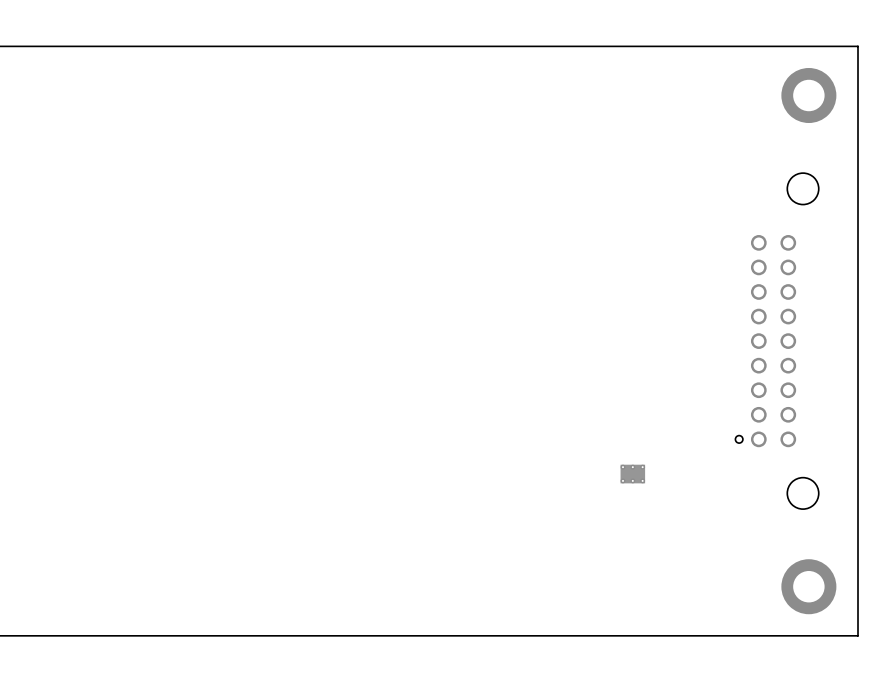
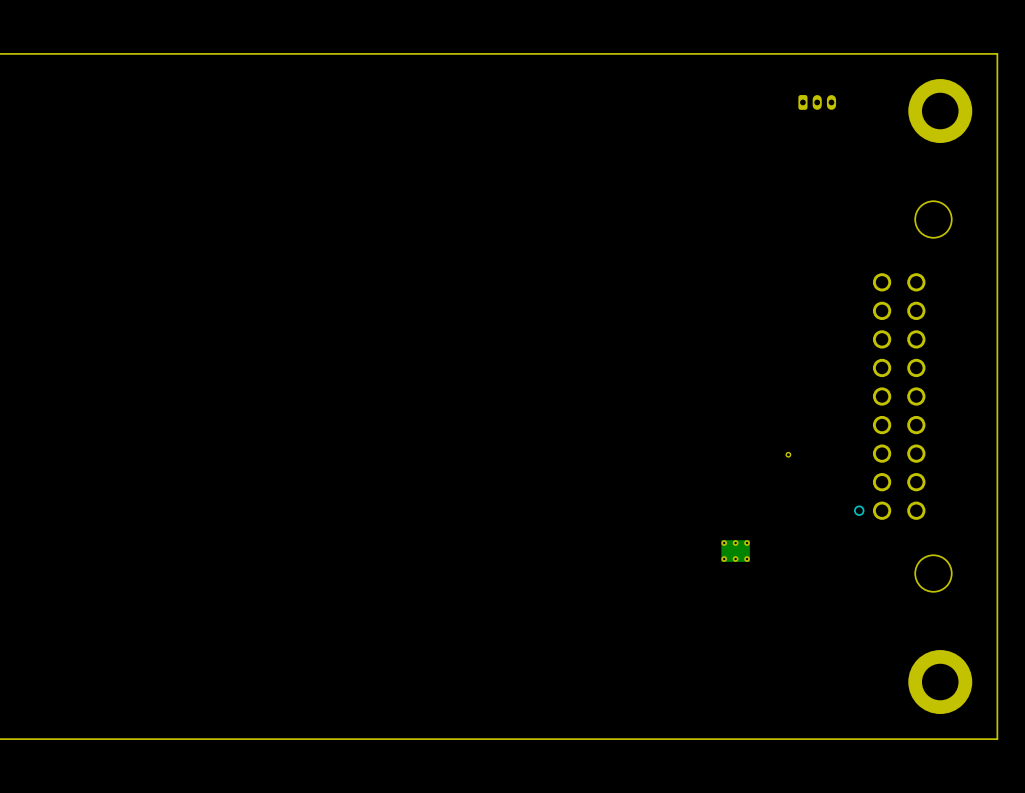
part: none -> (817, 102)
part: none -> (788, 454)

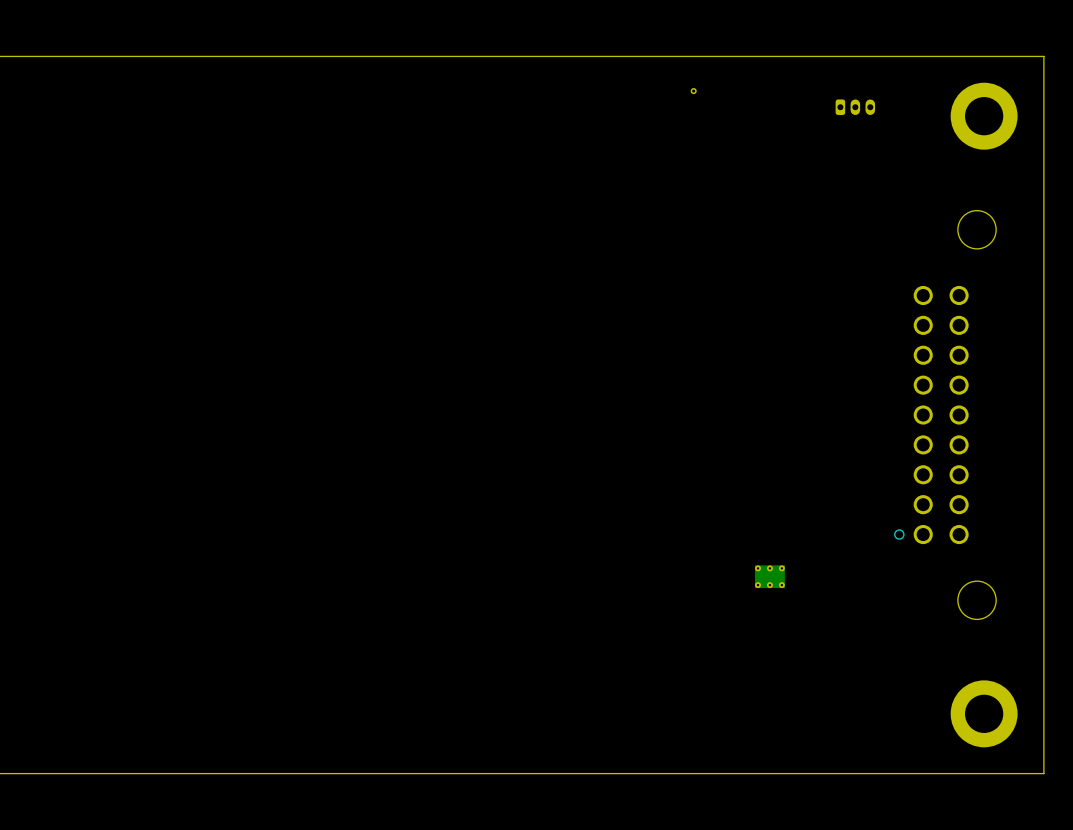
part: none -> (693, 91)
part: (788, 454) -> none

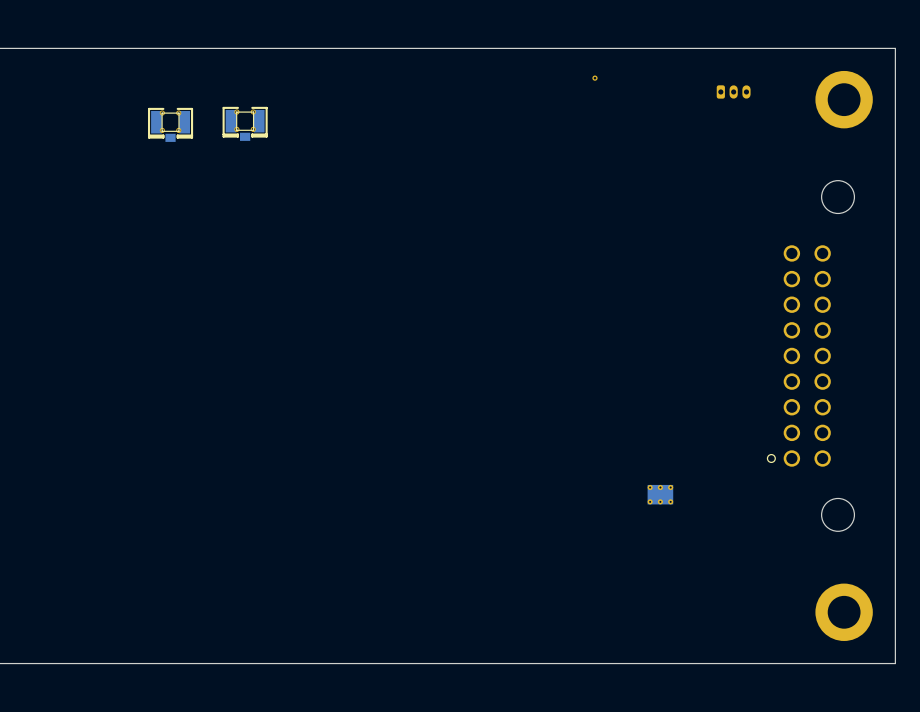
part: none -> (245, 123)
part: none -> (170, 124)

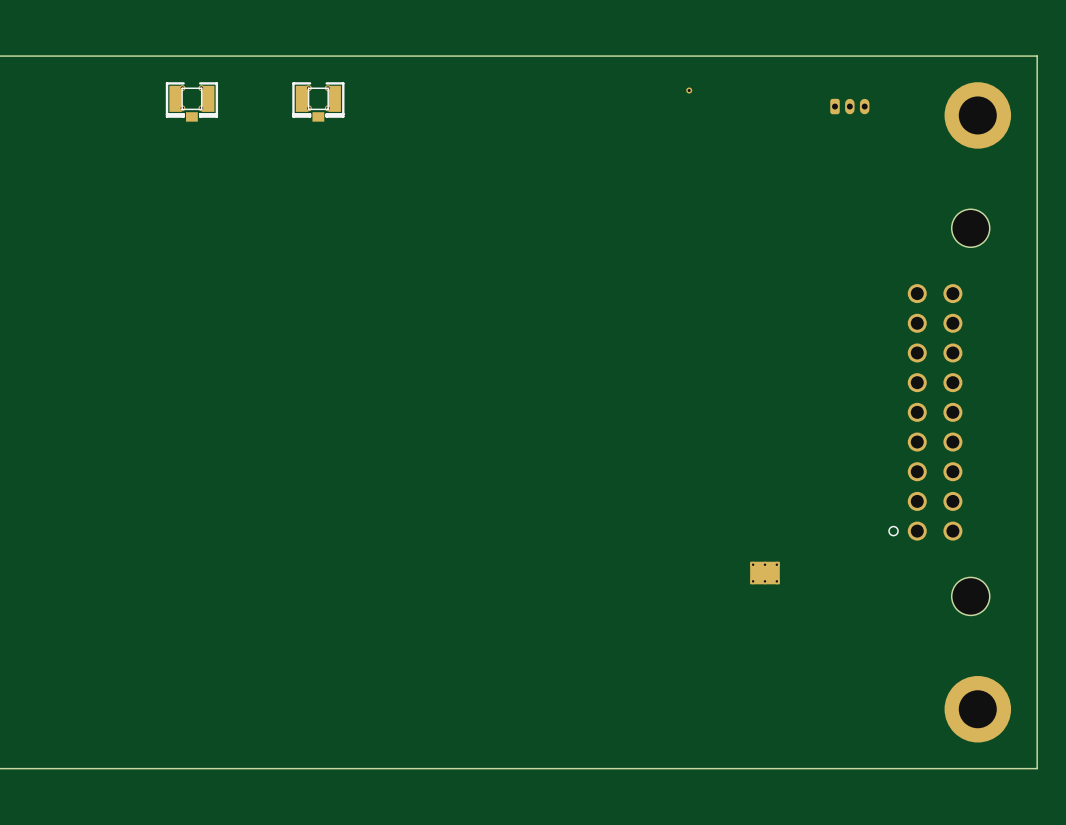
part: none -> (318, 101)
part: (245, 123) -> none
part position: (170, 124) -> (191, 101)

